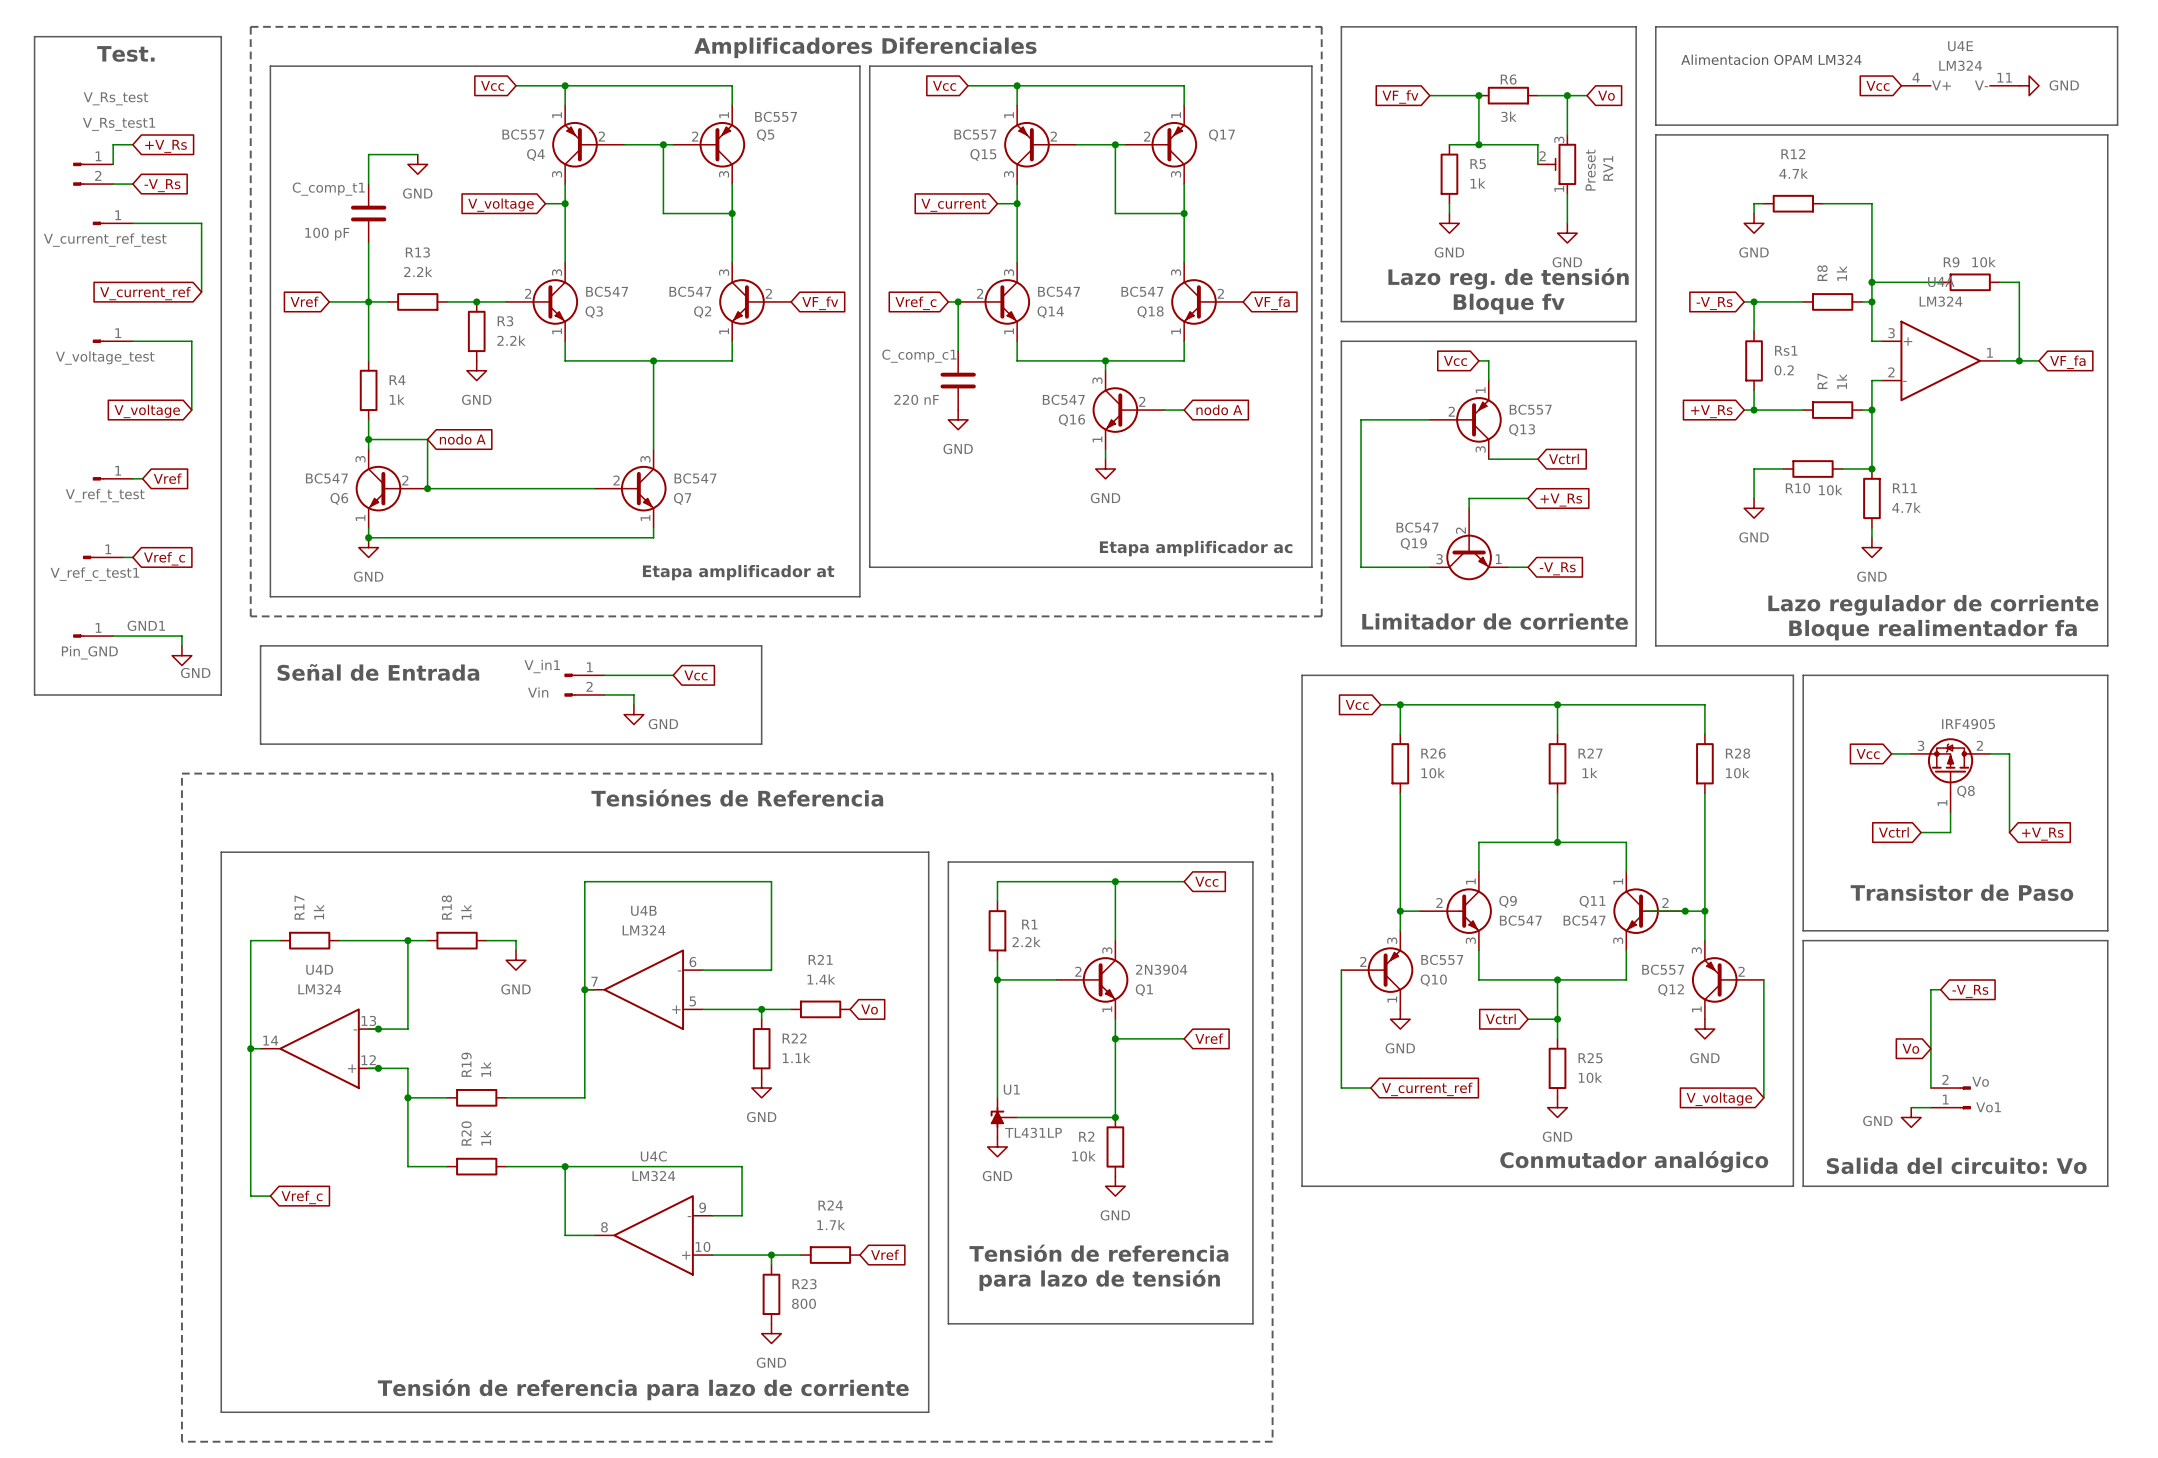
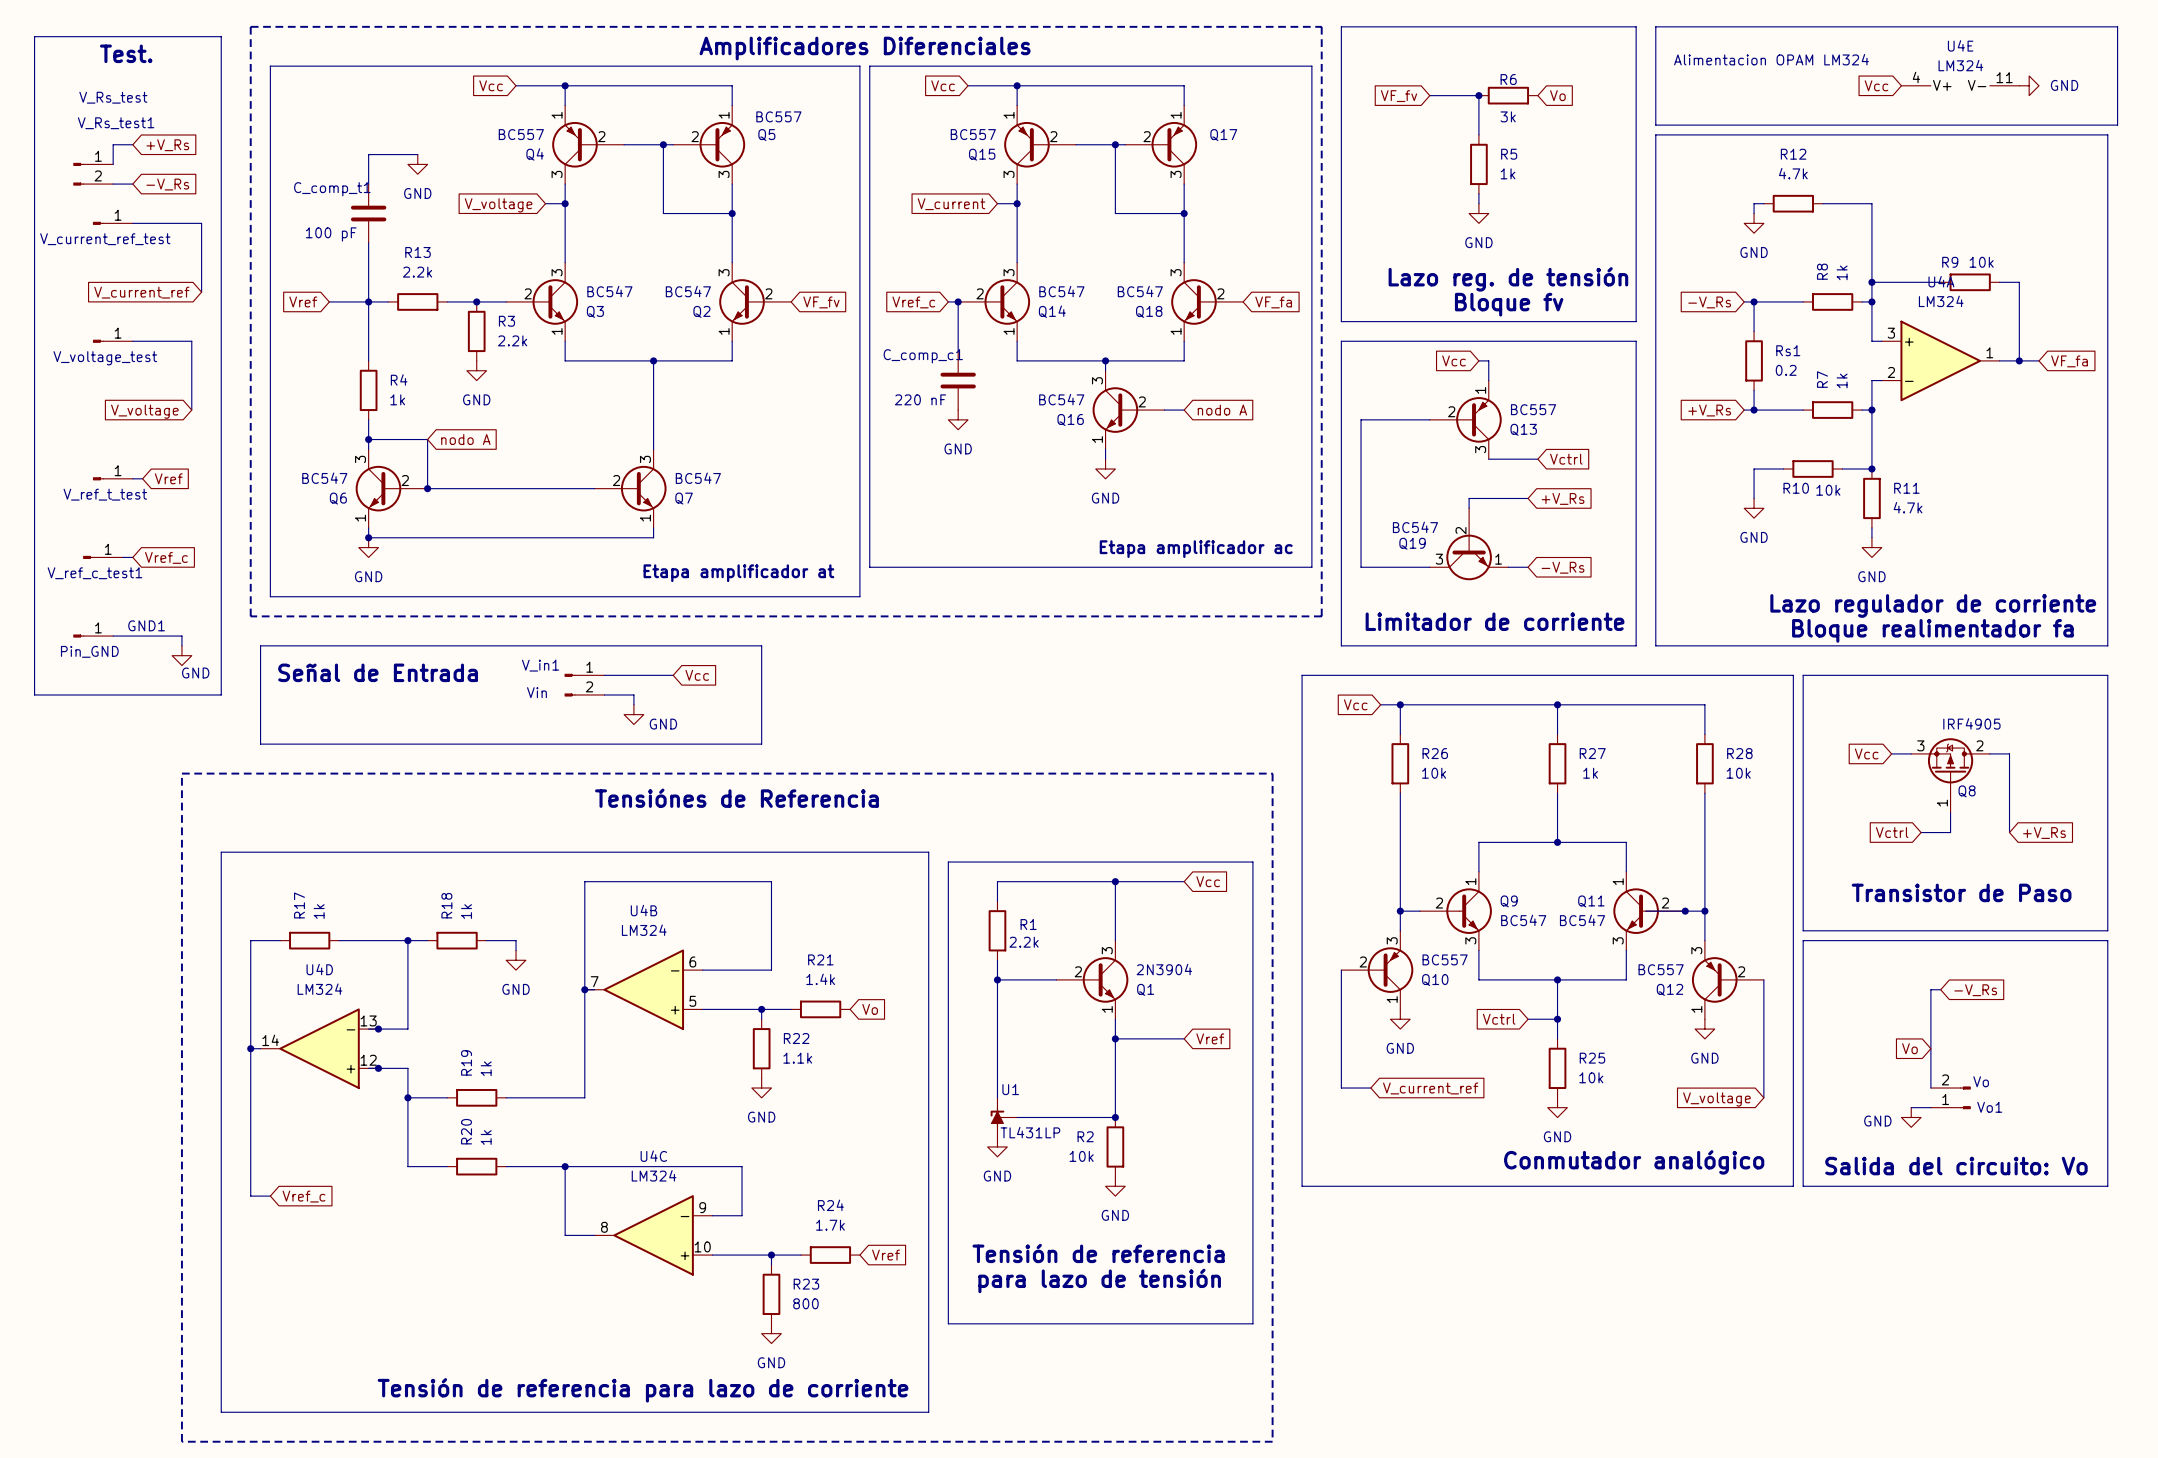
wire: (1537, 95) (1587, 95) -> none
wire: (1567, 95) (1567, 134) -> none
junction: (1567, 95) -> none
global label position: Vo (1606, 95) -> Vo (1557, 95)
wire: (1449, 144) (1537, 144) (1537, 164) -> none
junction: (1478, 144) -> none
RV1: Preset (1557, 164) -> none
R5 position: (1449, 174) -> (1478, 164)
wire: (1567, 193) (1567, 223) -> none
wire: (1449, 203) (1449, 213) -> (1478, 193) (1478, 203)
power symbol position: GND (1449, 223) -> GND (1478, 213)
power symbol: GND (1567, 233) -> none

